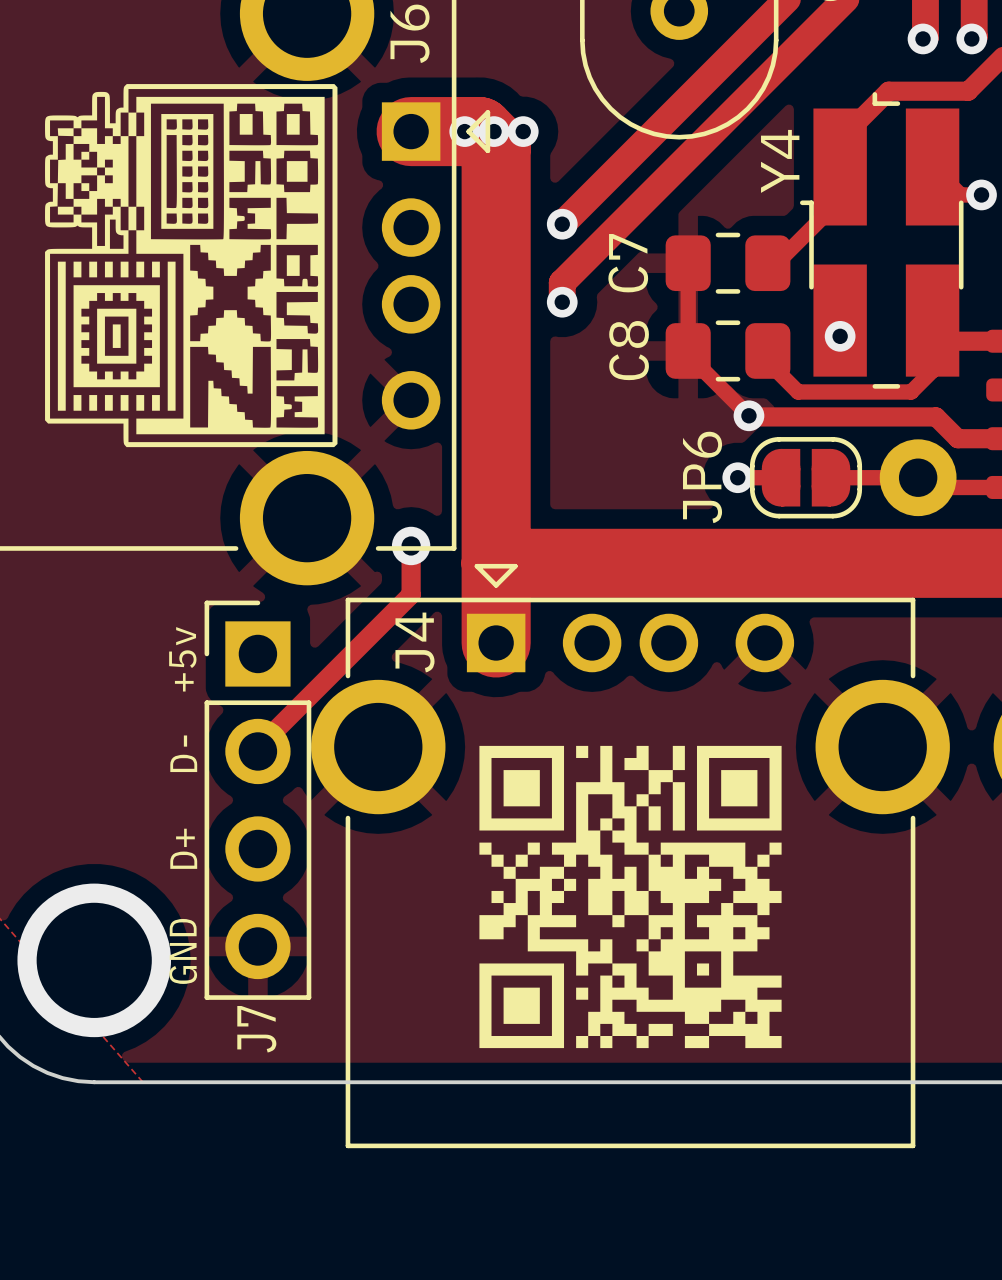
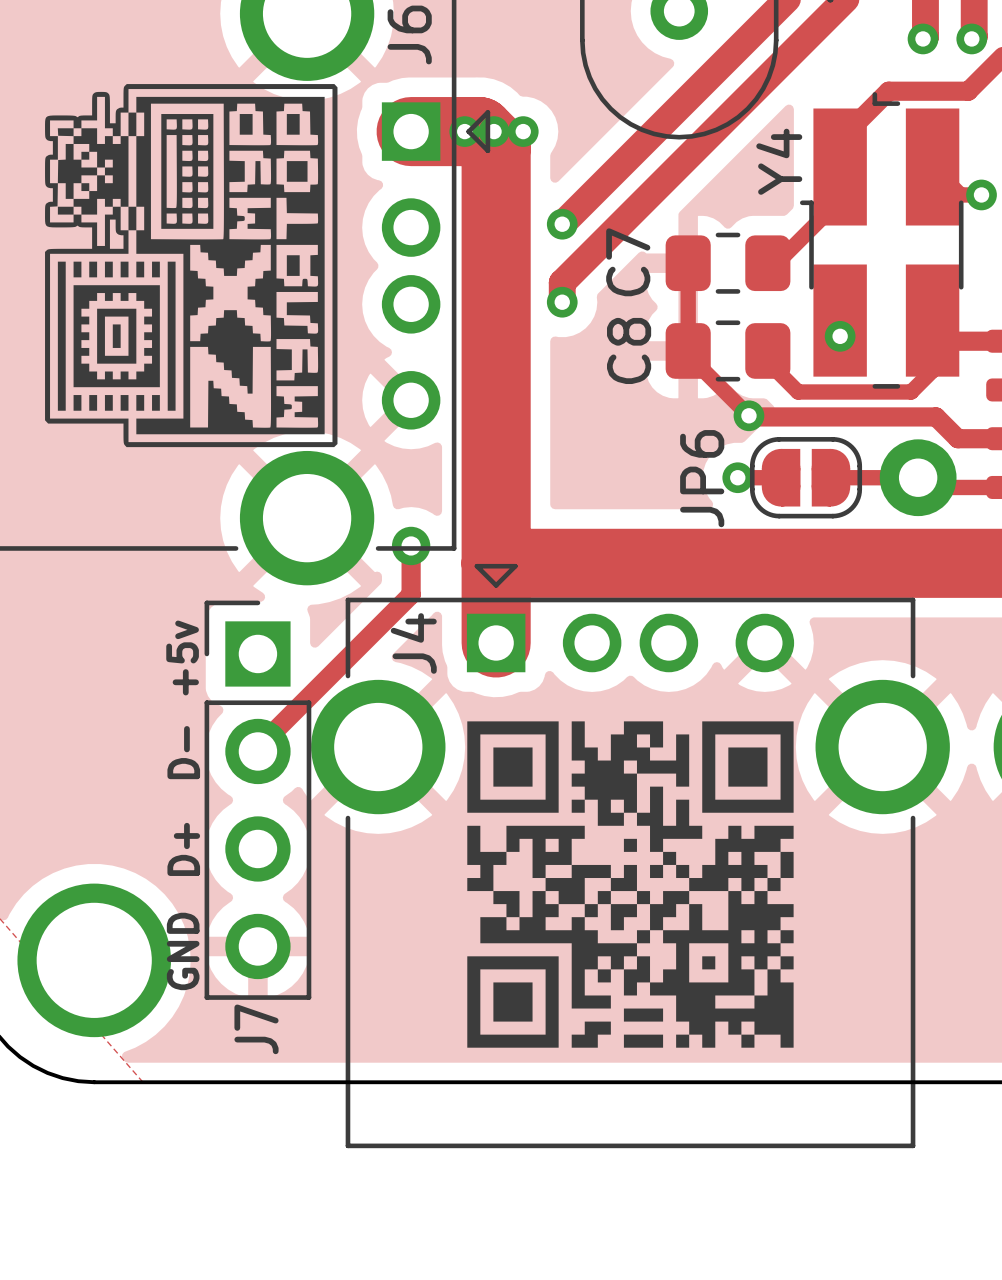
drawing shape: [479, 745, 782, 1049] -> [467, 721, 794, 1048]

